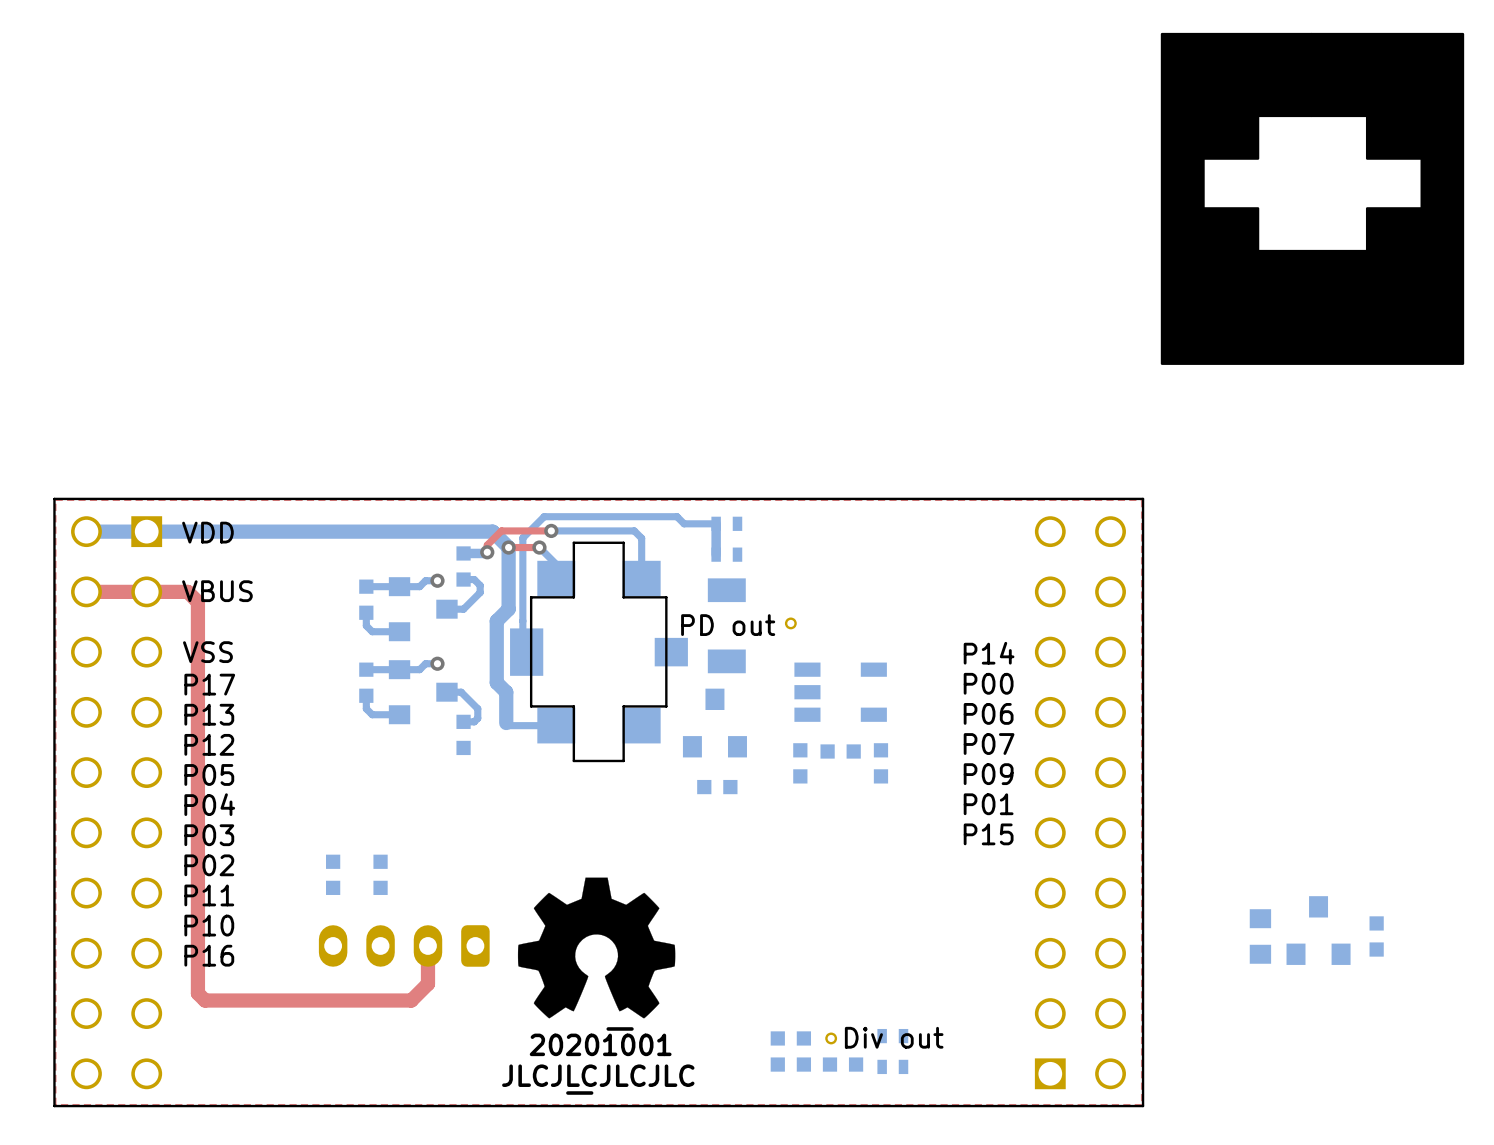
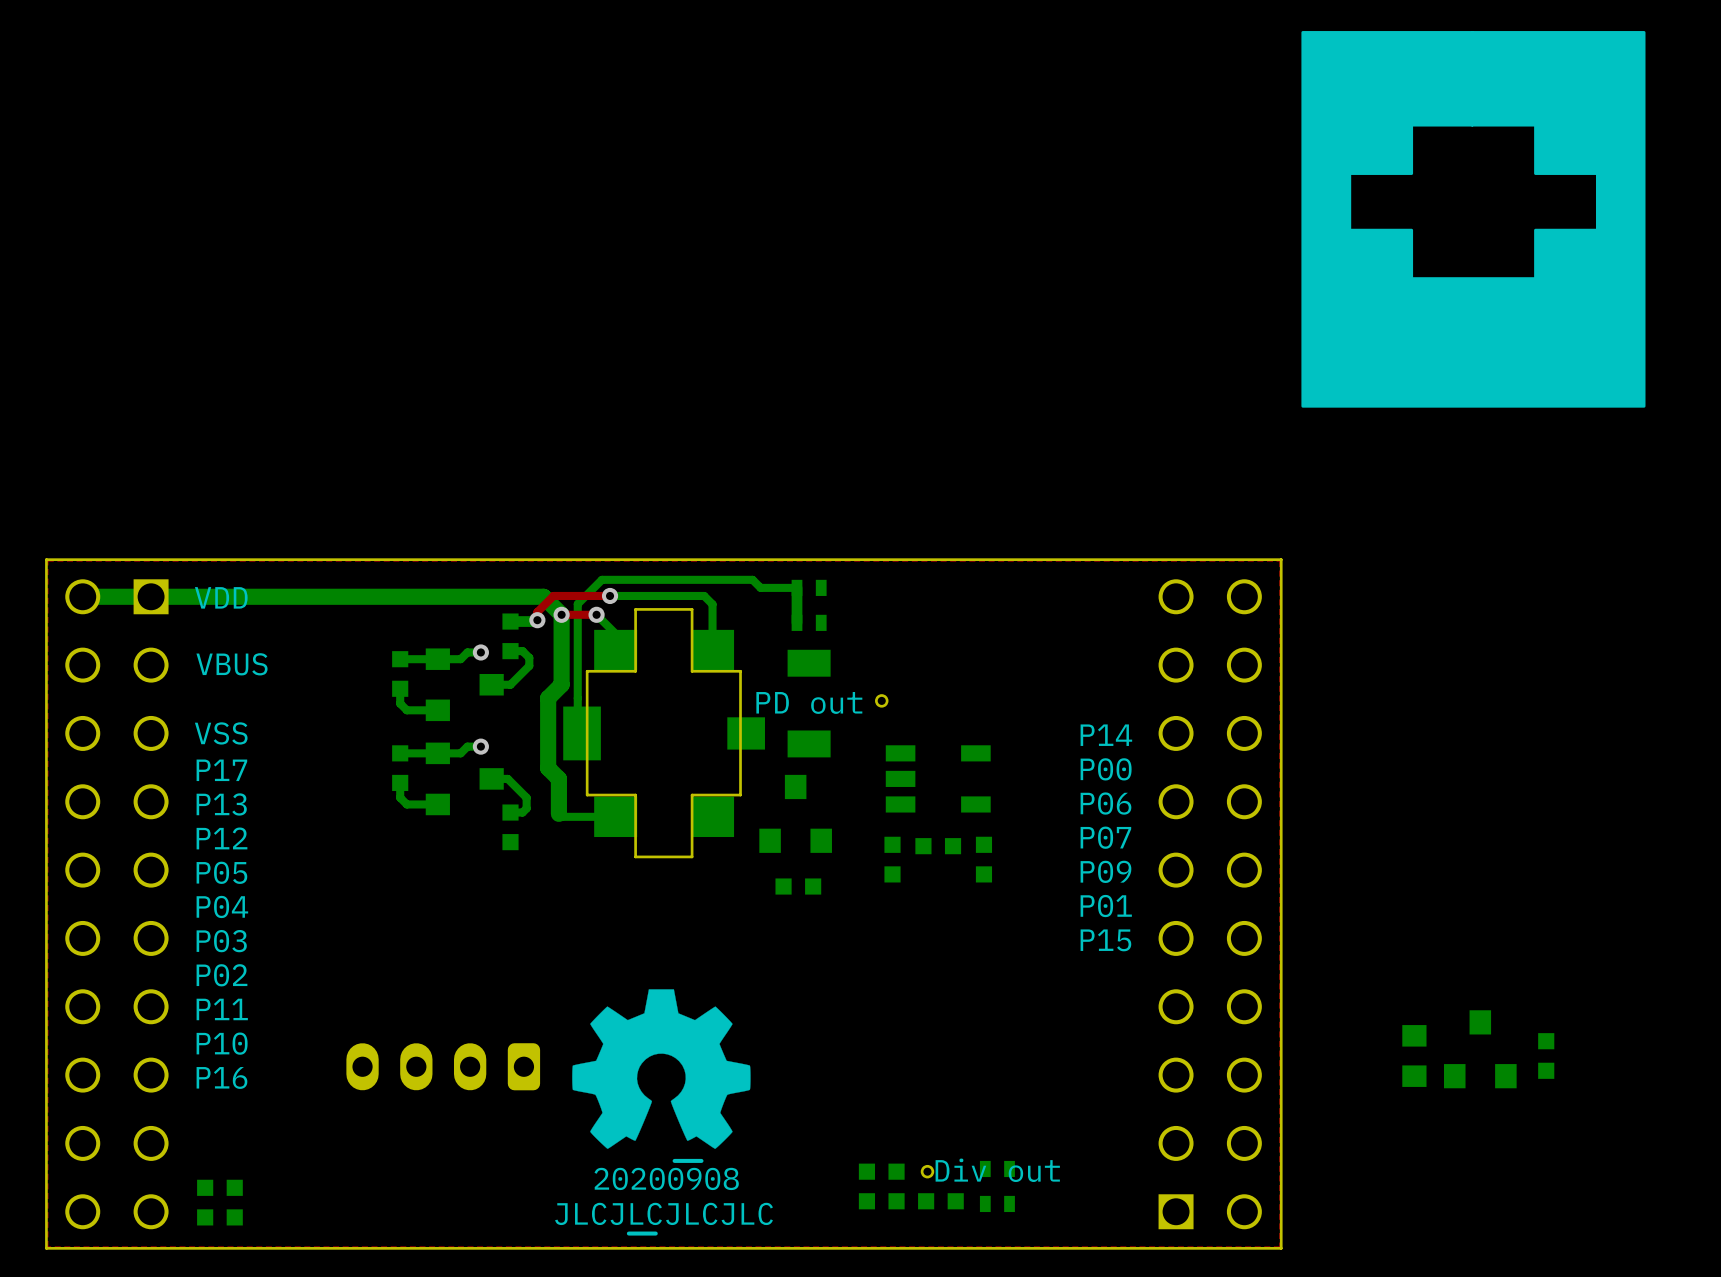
top track: (86, 591) (187, 591) (197, 602) (197, 993) (205, 1000) (411, 1000) (427, 983) (427, 945) -> none
part: (333, 874) -> none
part: (380, 874) -> none
drawing shape: [529, 1027, 672, 1057] -> [594, 1158, 739, 1191]
part: none -> (219, 1187)
part: none -> (219, 1217)

